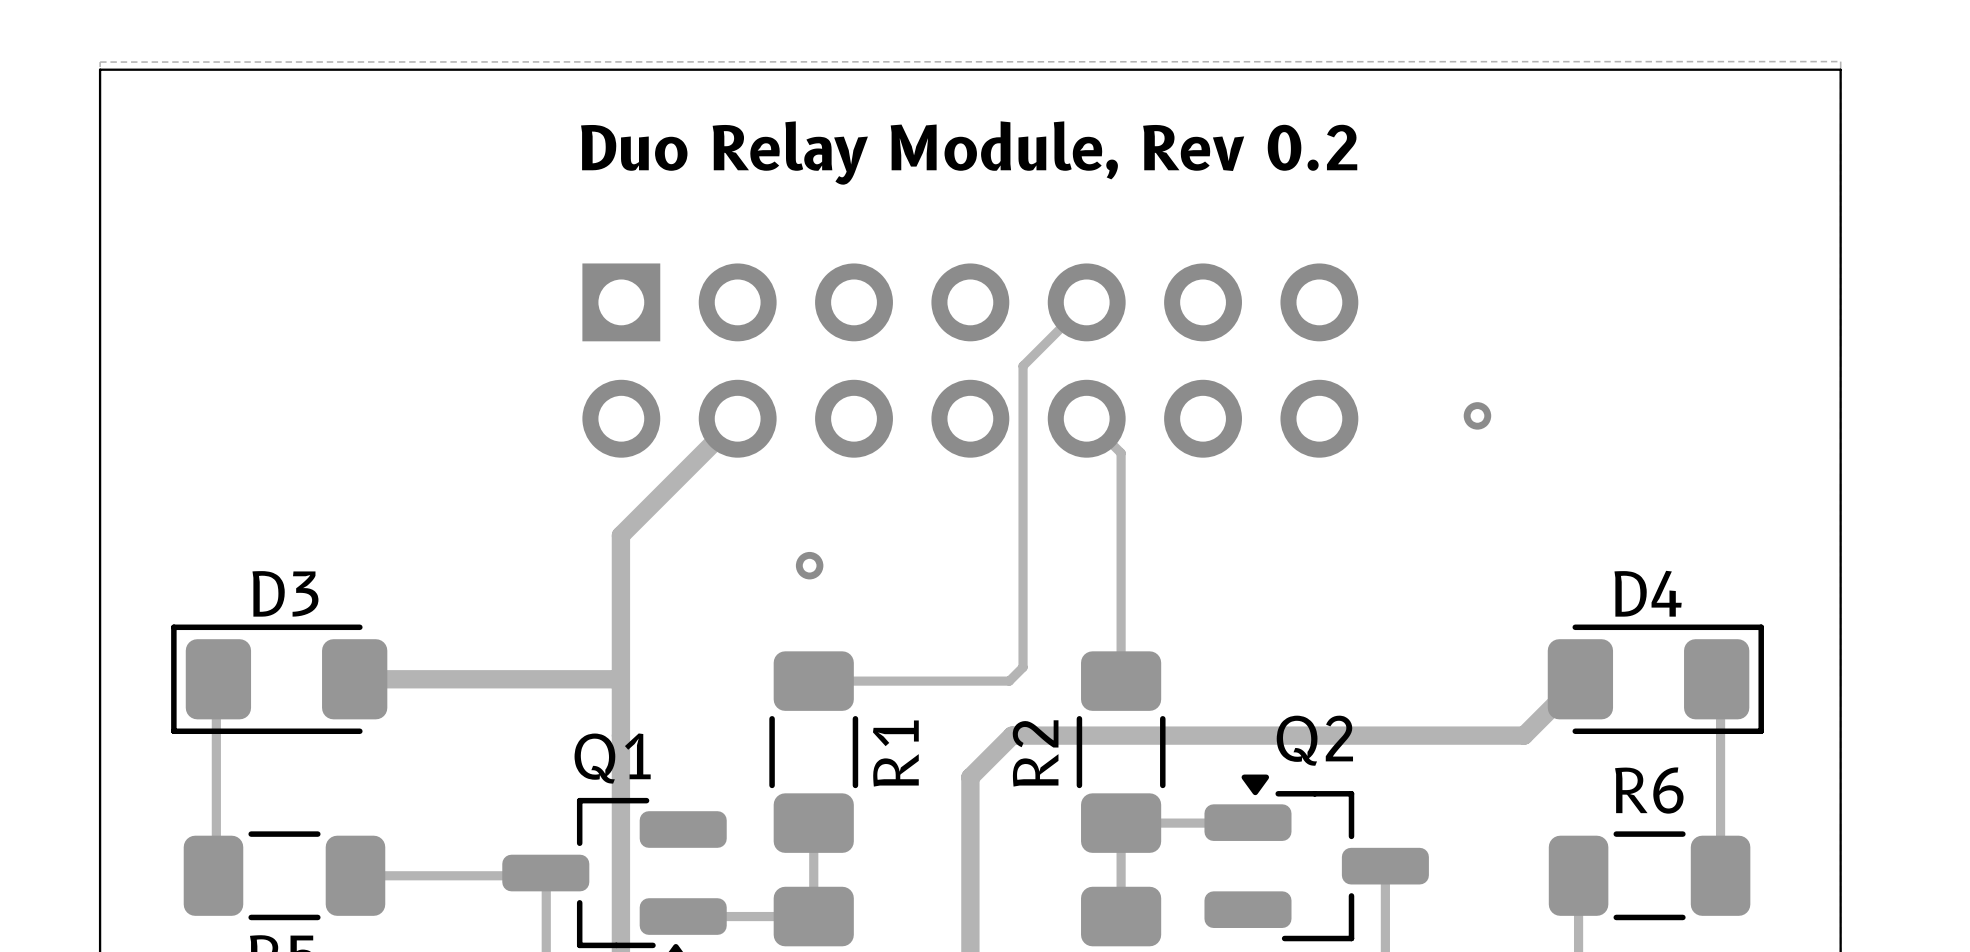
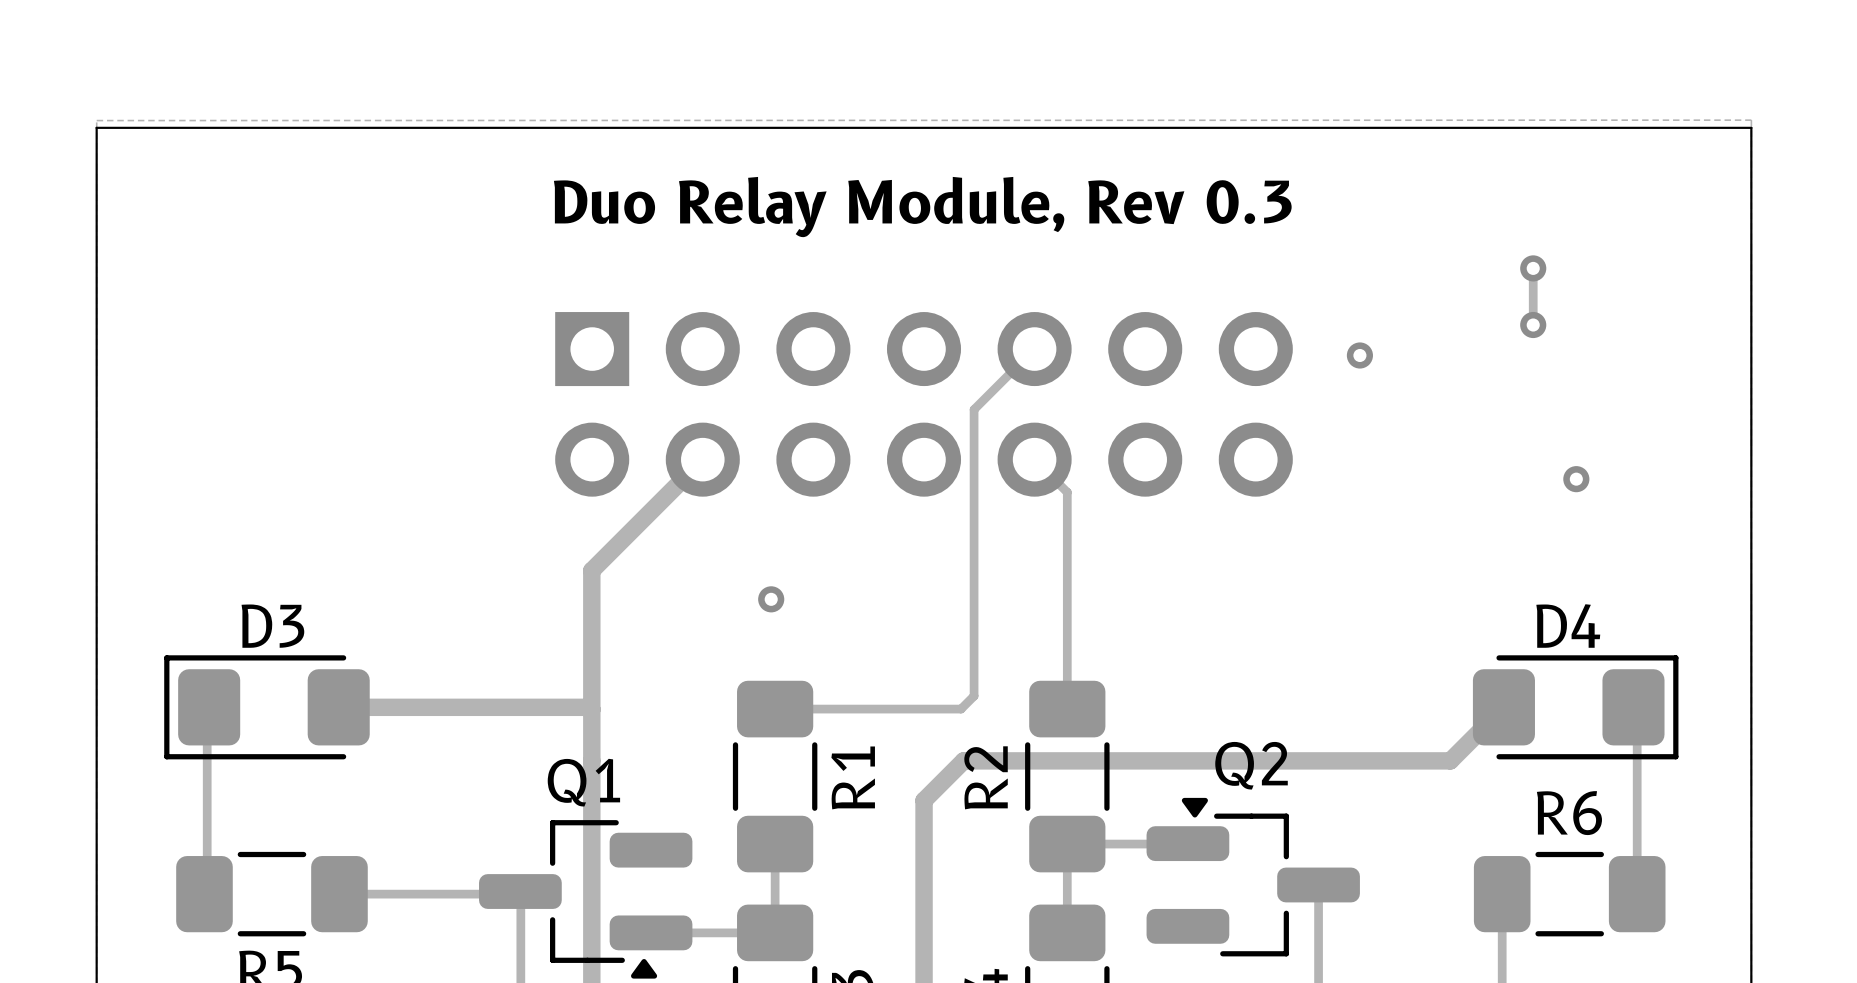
text: Duo Relay Module, Rev 0.2 (969, 153) -> Duo Relay Module, Rev 0.3 (922, 207)
track: none -> (1533, 268) (1533, 325)
via: none -> (1533, 268)
via: none -> (1533, 325)
via: none -> (1359, 355)
via: (1477, 415) -> none
via: none -> (1576, 479)

